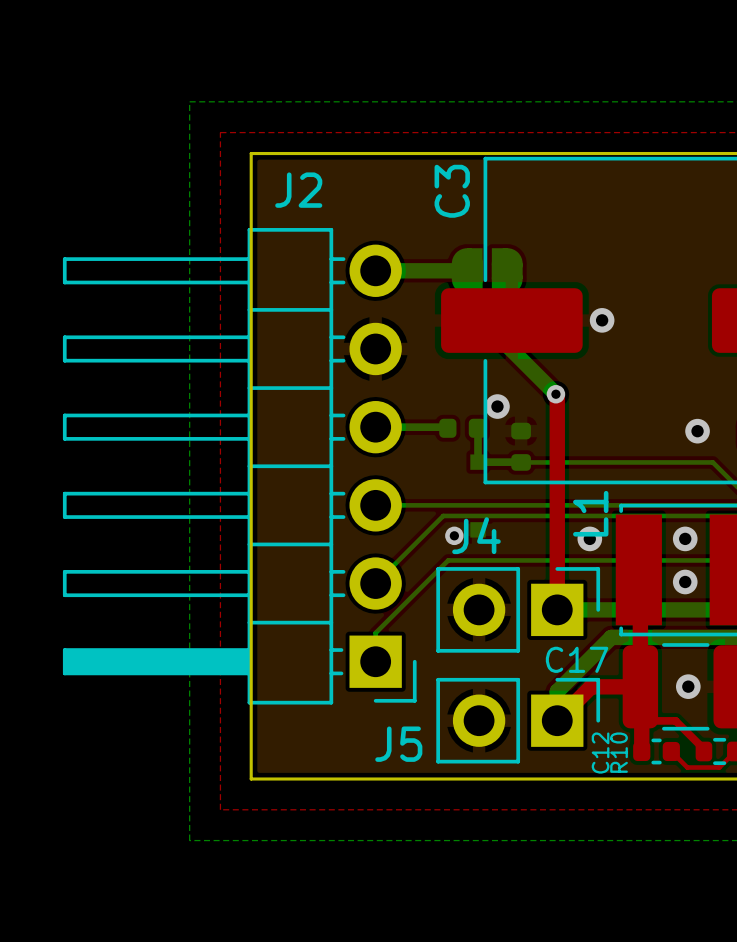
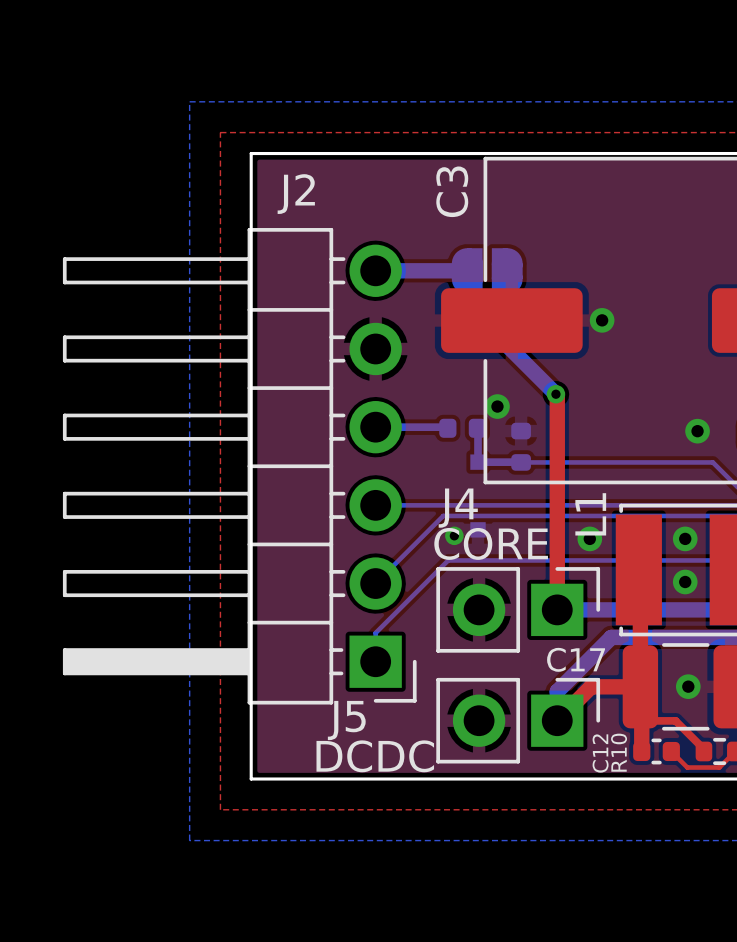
J4 name position: J4 (476, 535) -> J4 (458, 508)
text: none -> CORE (491, 543)
J5 name position: J5 (398, 744) -> J5 (346, 720)
text: none -> DCDC (375, 756)

